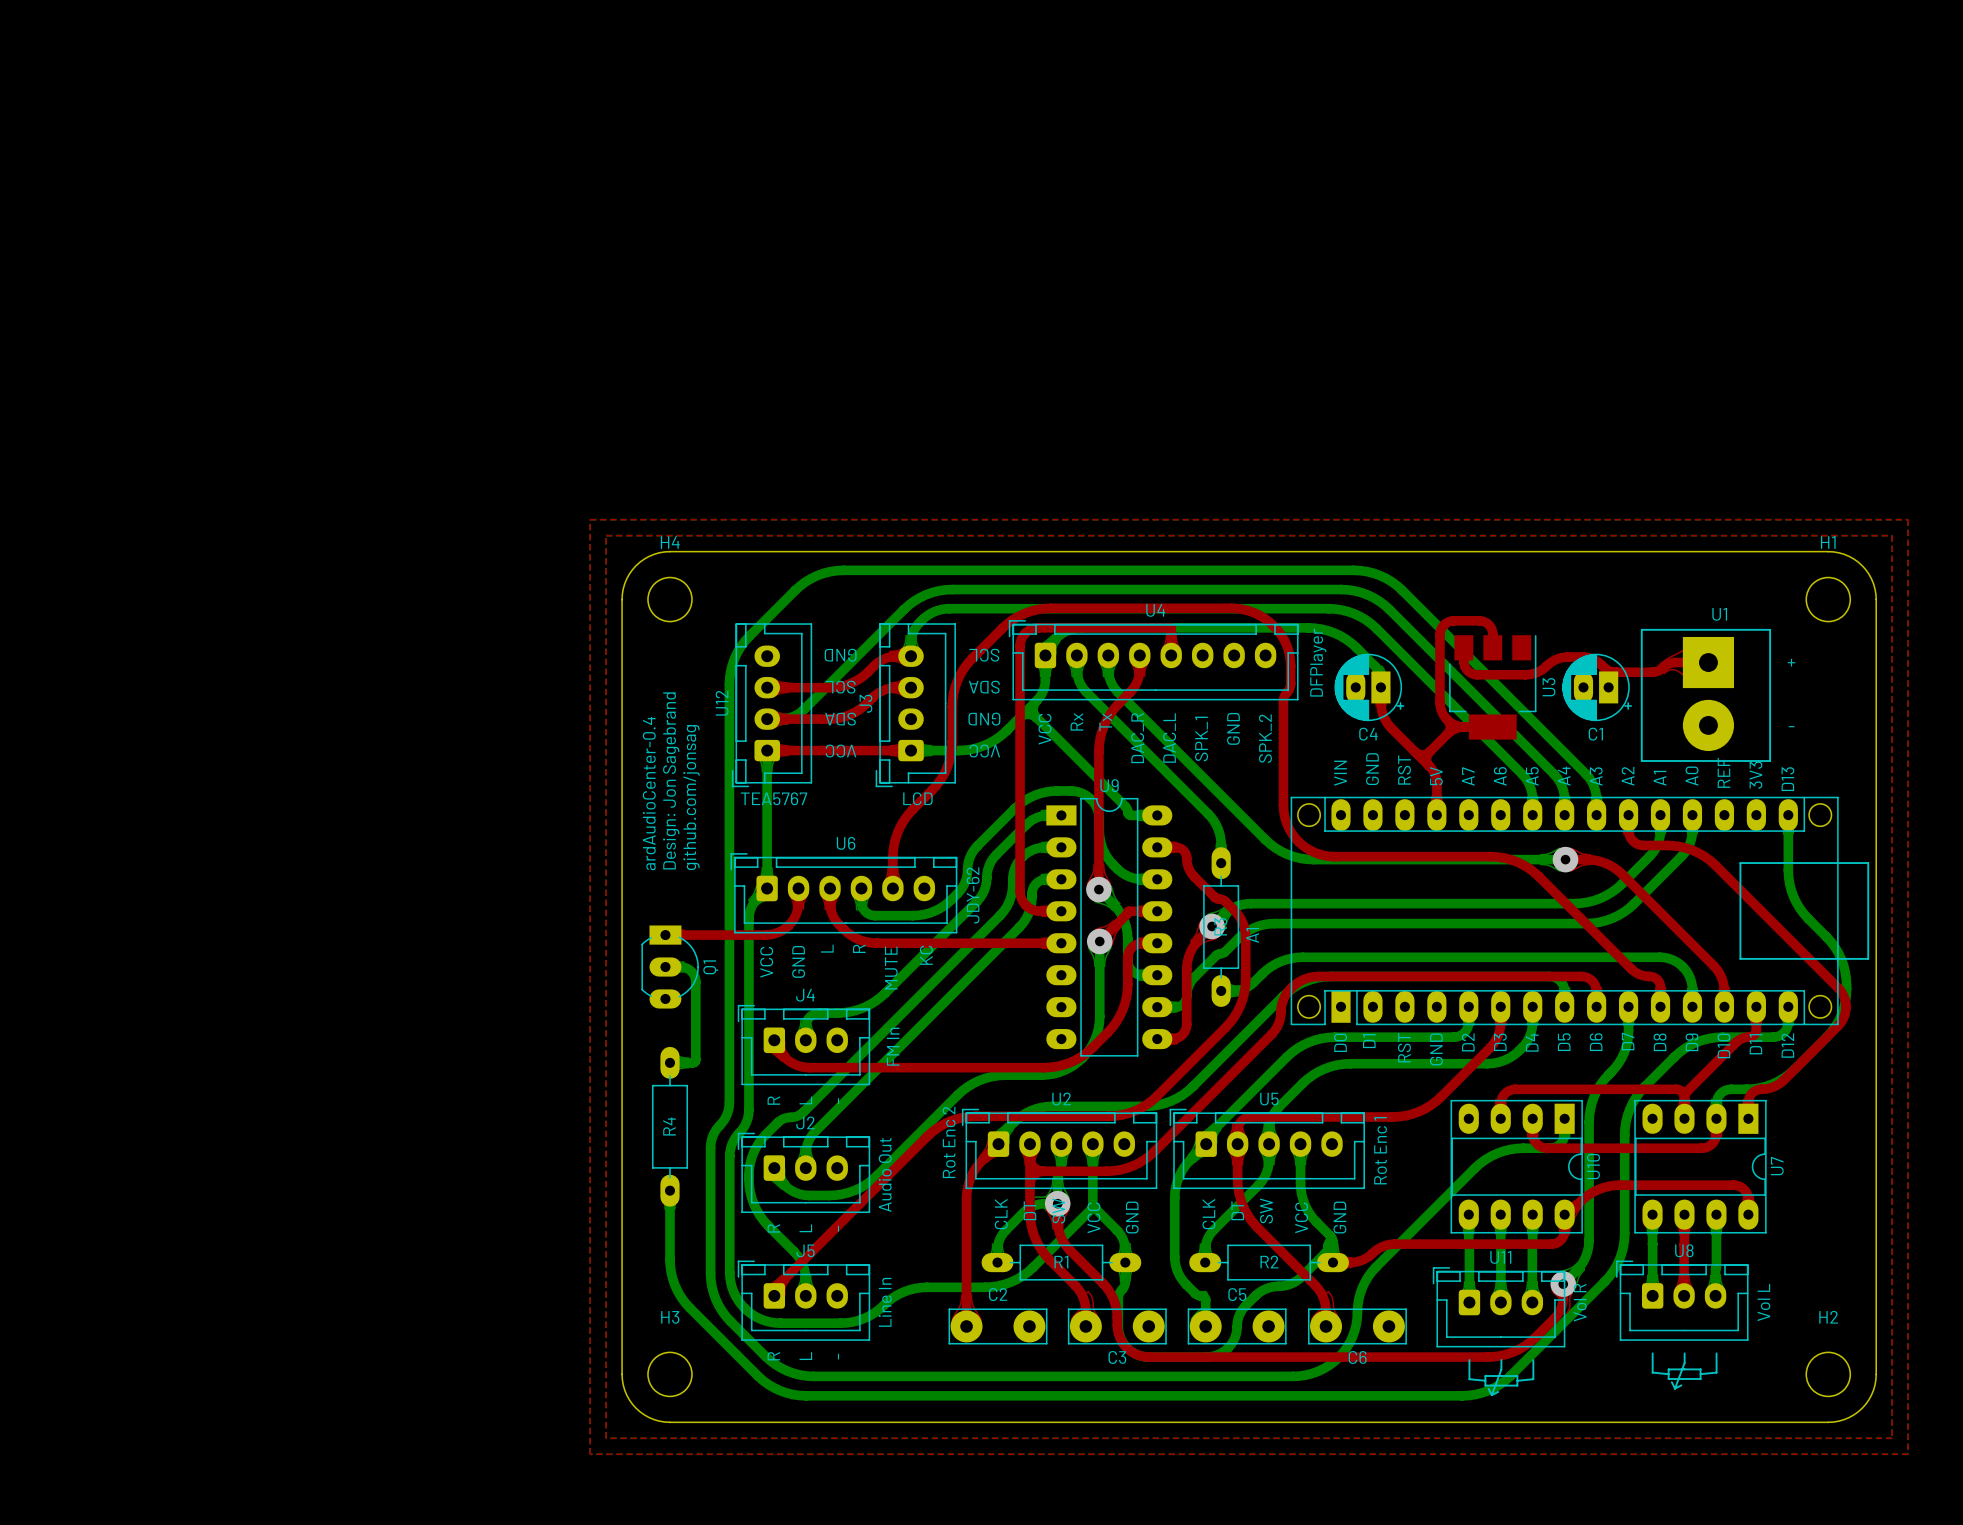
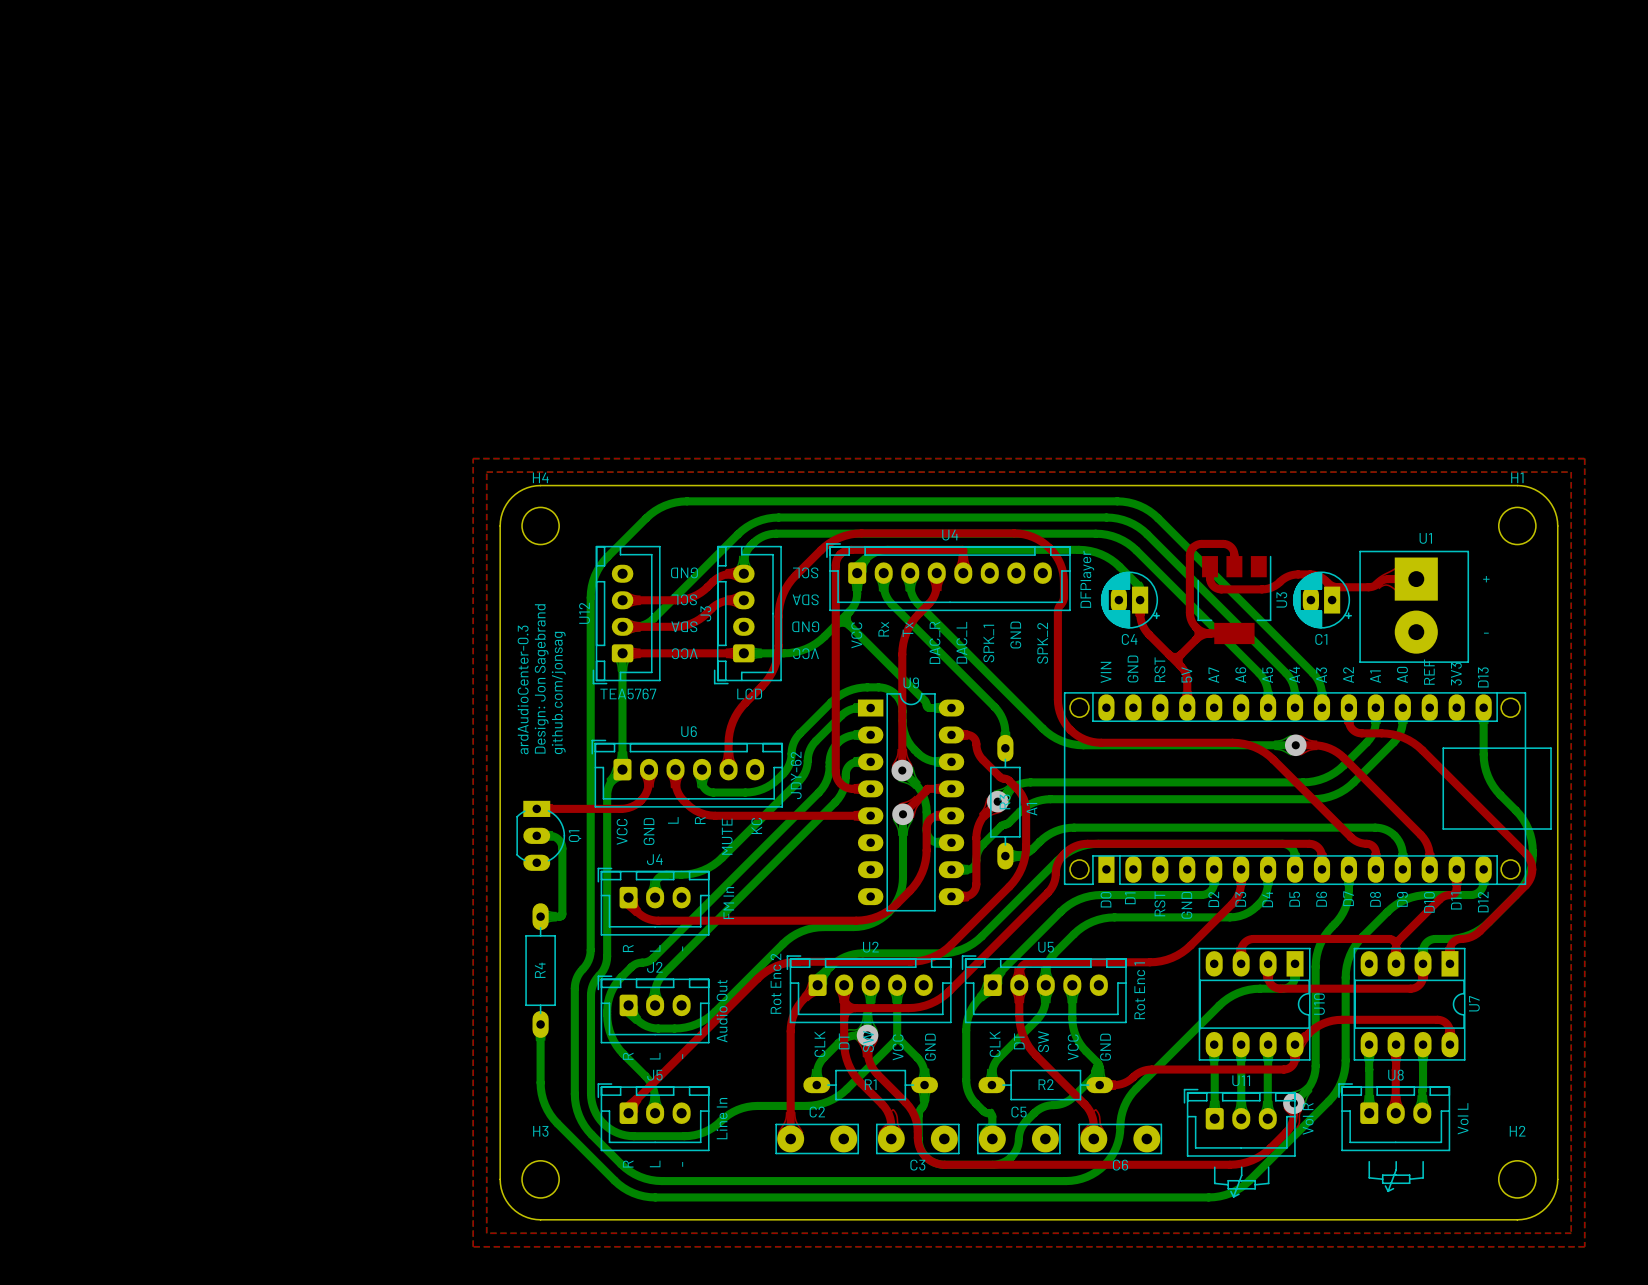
text: ardAudioCenter-0.4 (649, 793) -> ardAudioCenter-0.3 (523, 689)

